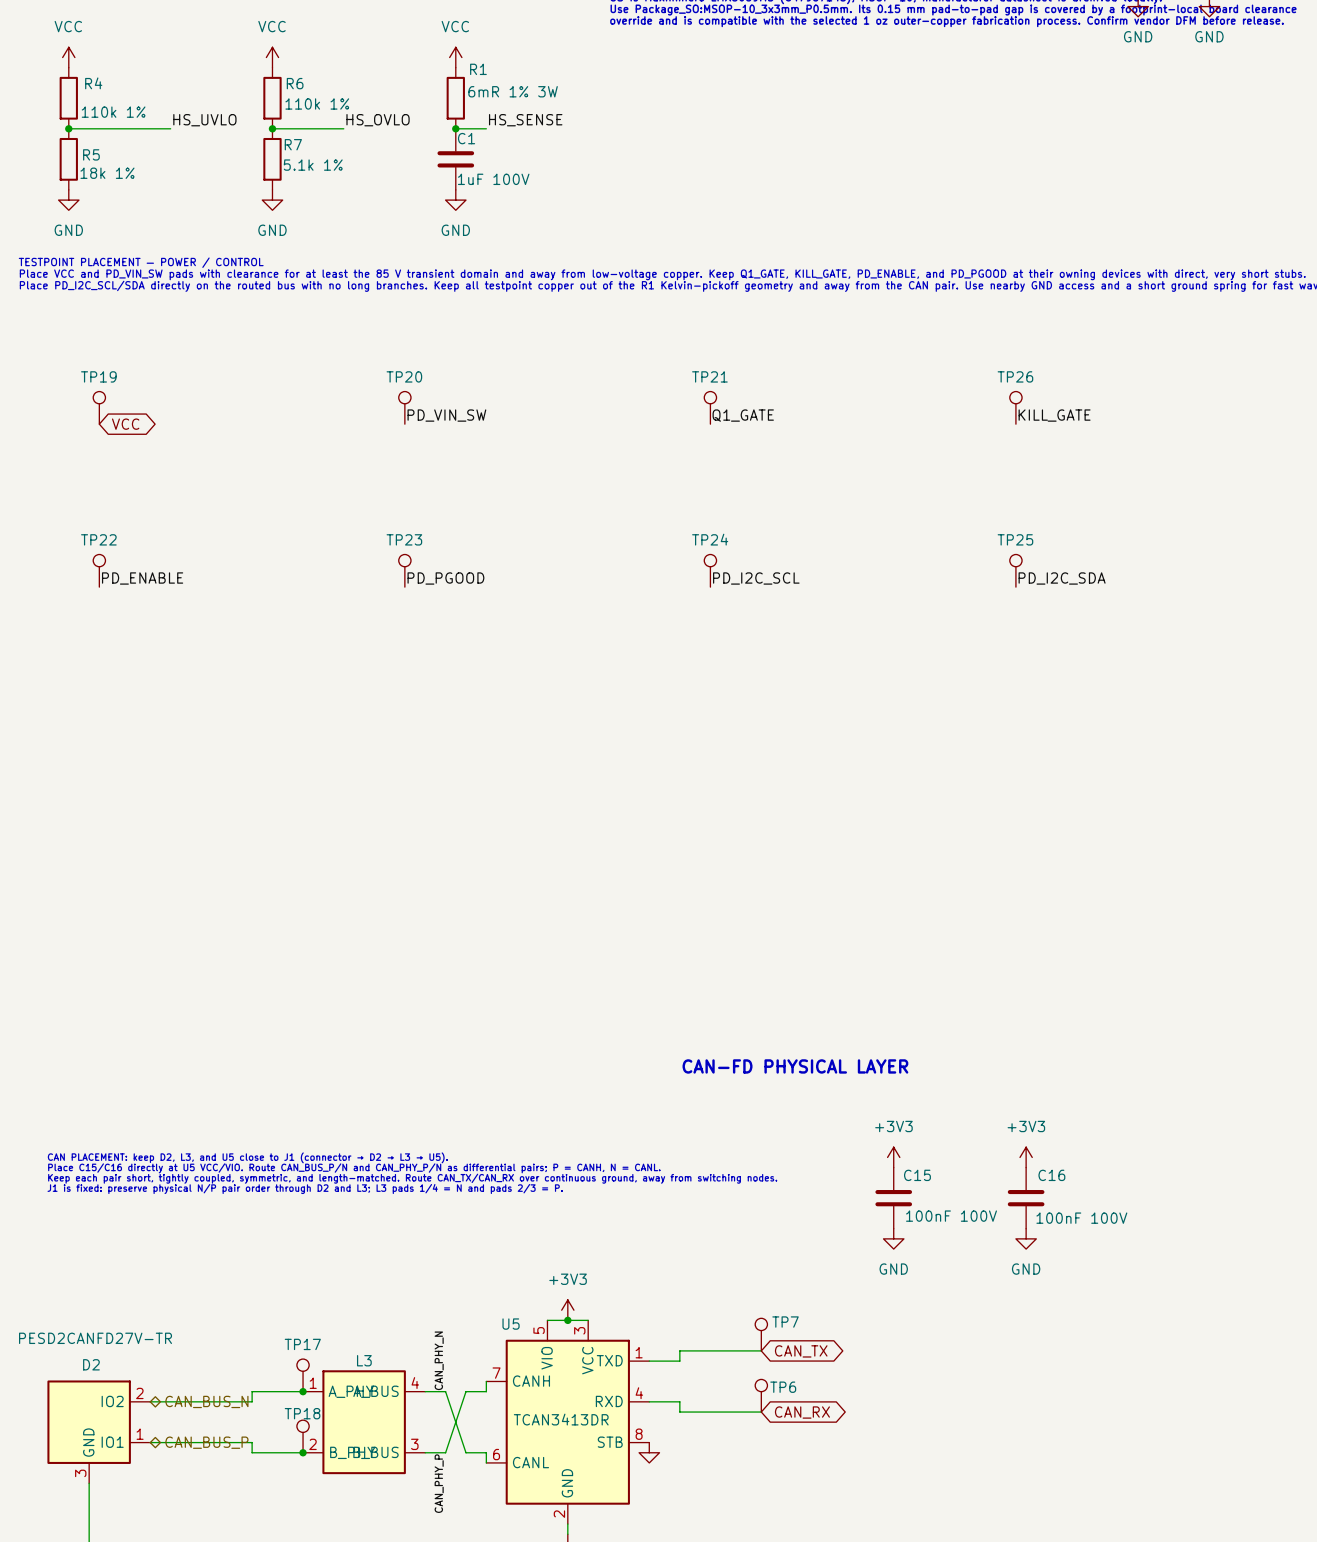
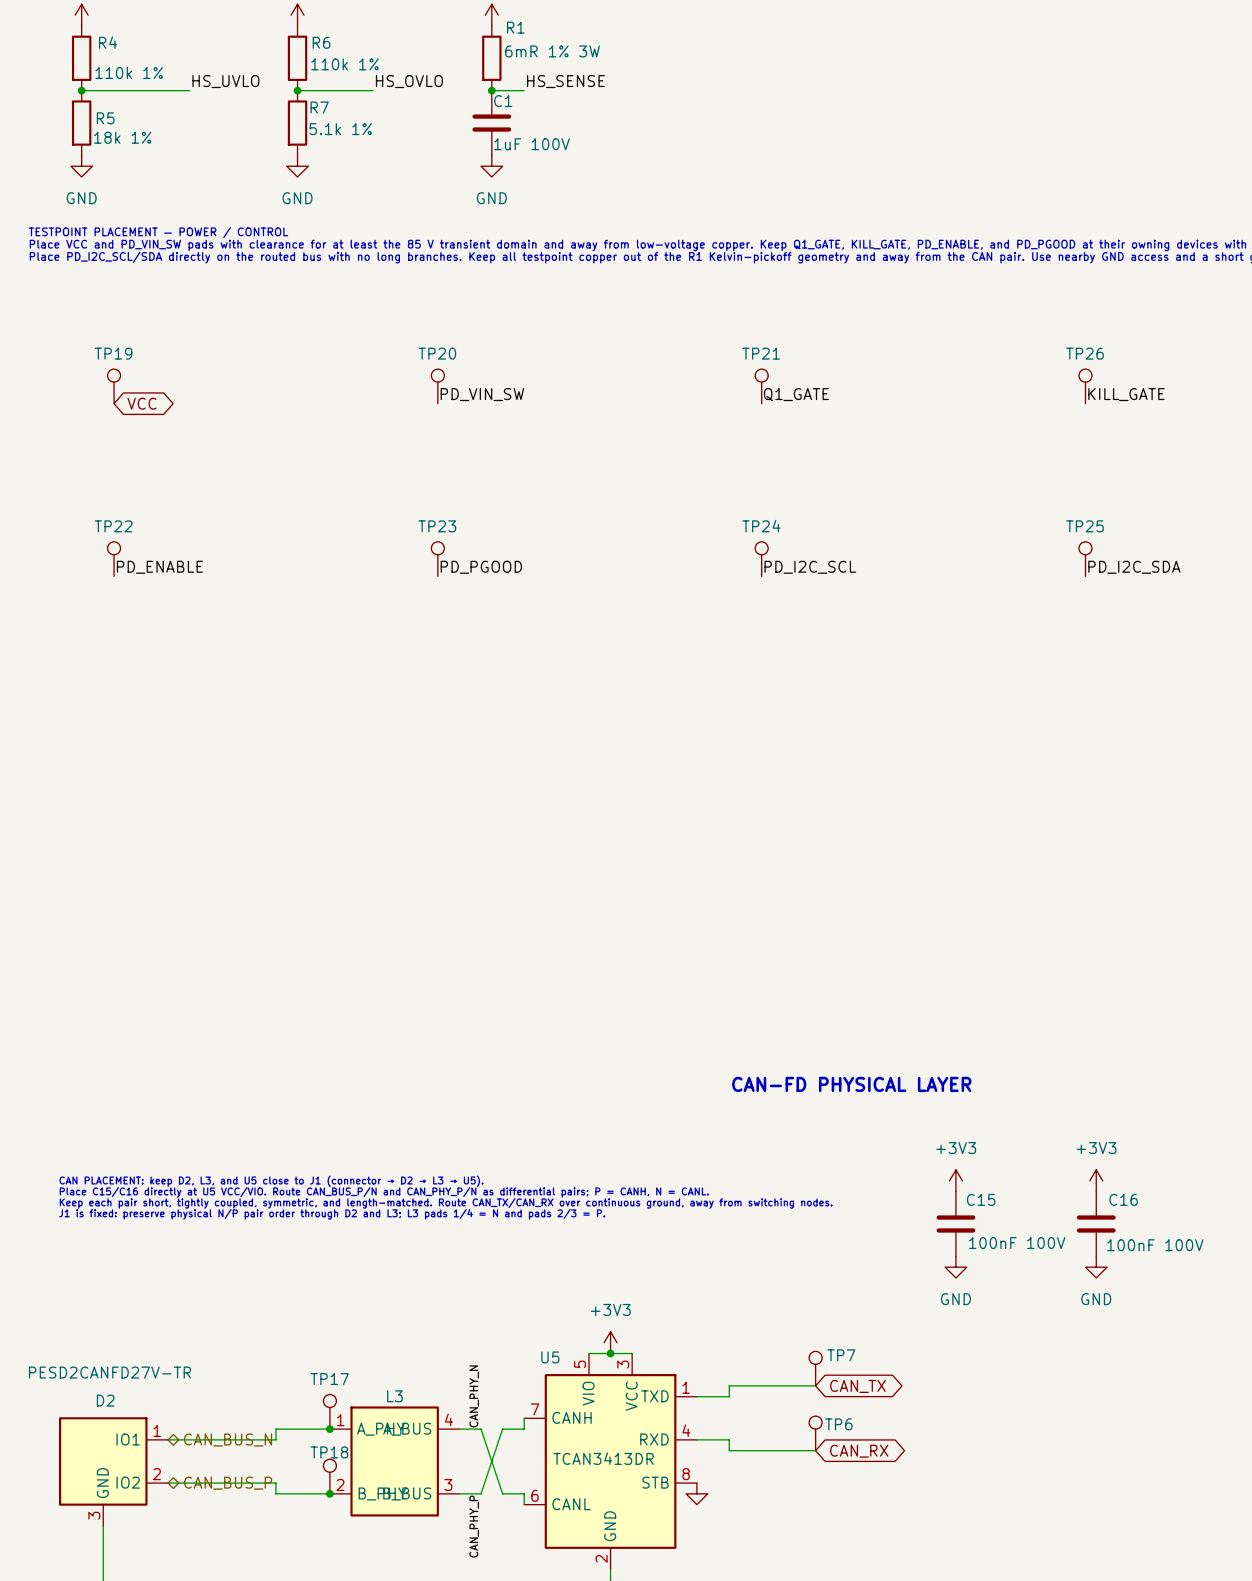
D2 pin number: 2 (139, 1393) -> 1 (157, 1430)
D2 pin name: IO2 (112, 1401) -> IO1 (128, 1439)
D2 pin number: 1 (140, 1434) -> 2 (156, 1474)
D2 pin name: IO1 (112, 1442) -> IO2 (128, 1482)

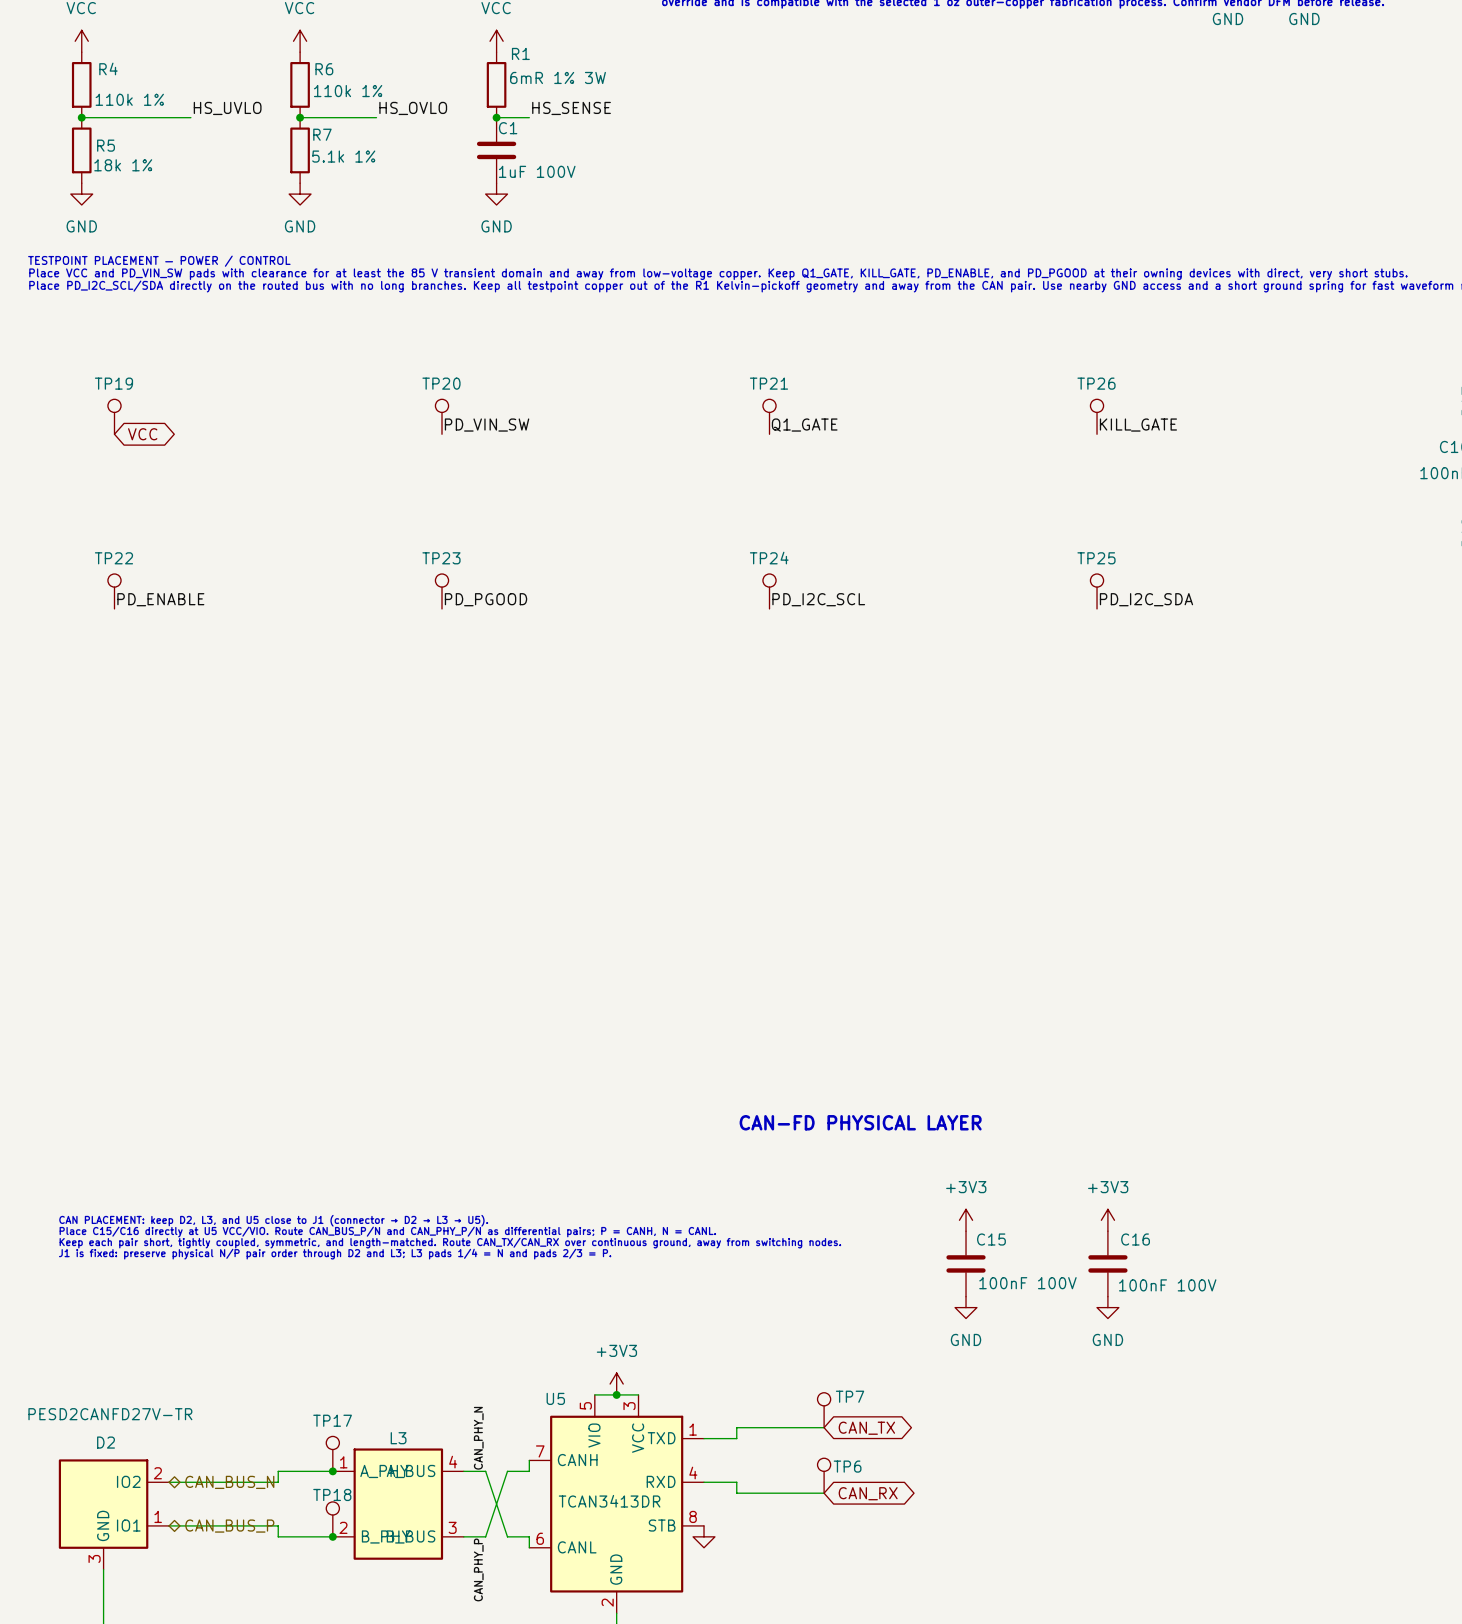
D2 pin number: 1 (157, 1430) -> 2 (157, 1473)
D2 pin name: IO1 (128, 1439) -> IO2 (128, 1481)
D2 pin number: 2 (156, 1474) -> 1 (158, 1516)
D2 pin name: IO2 (128, 1482) -> IO1 (128, 1525)

